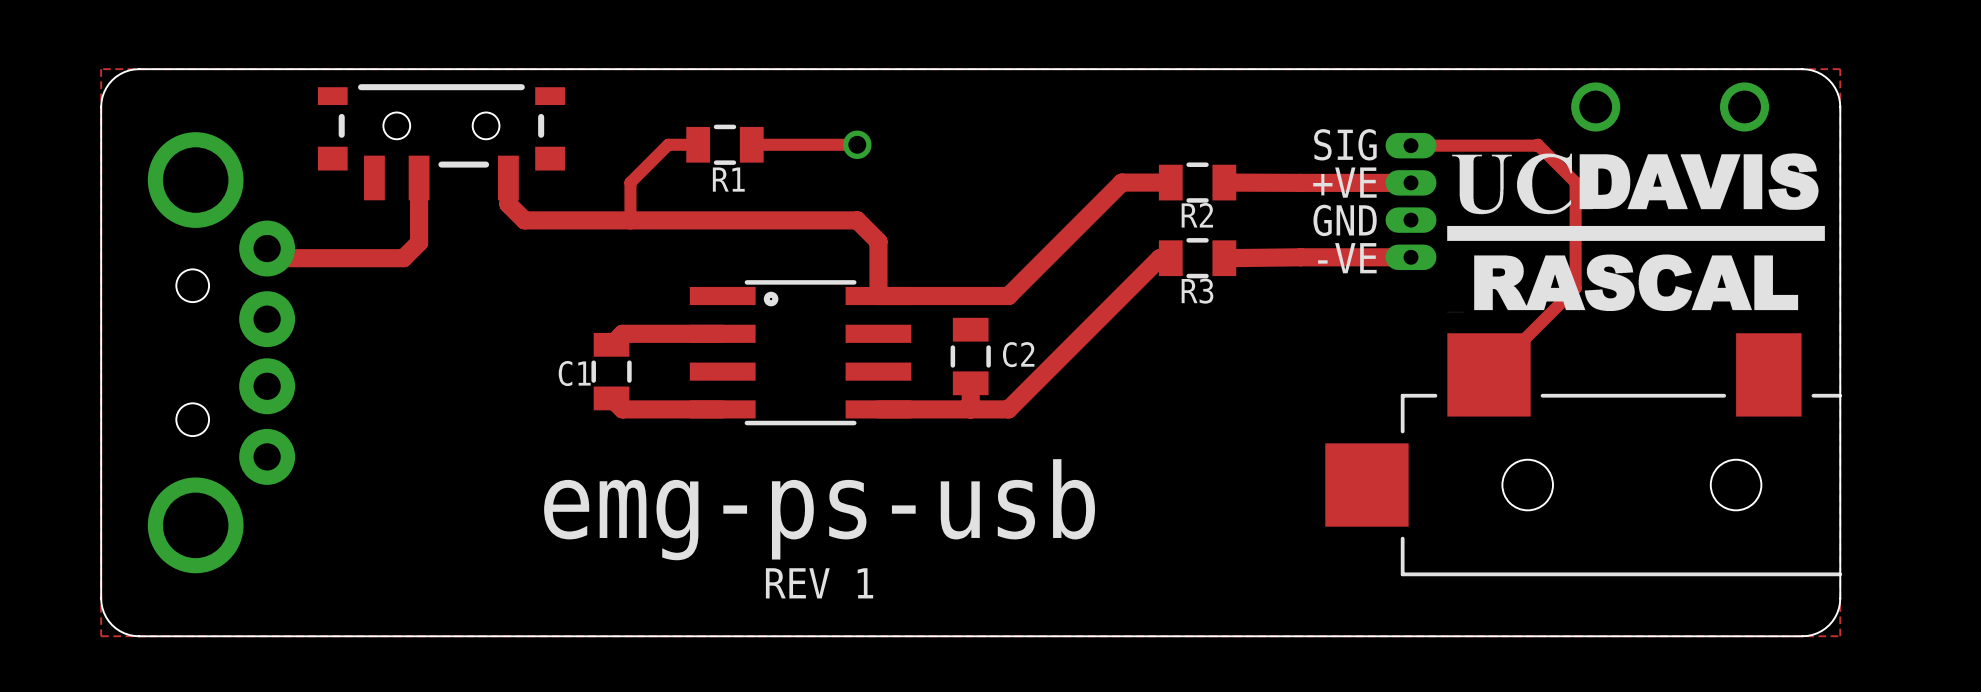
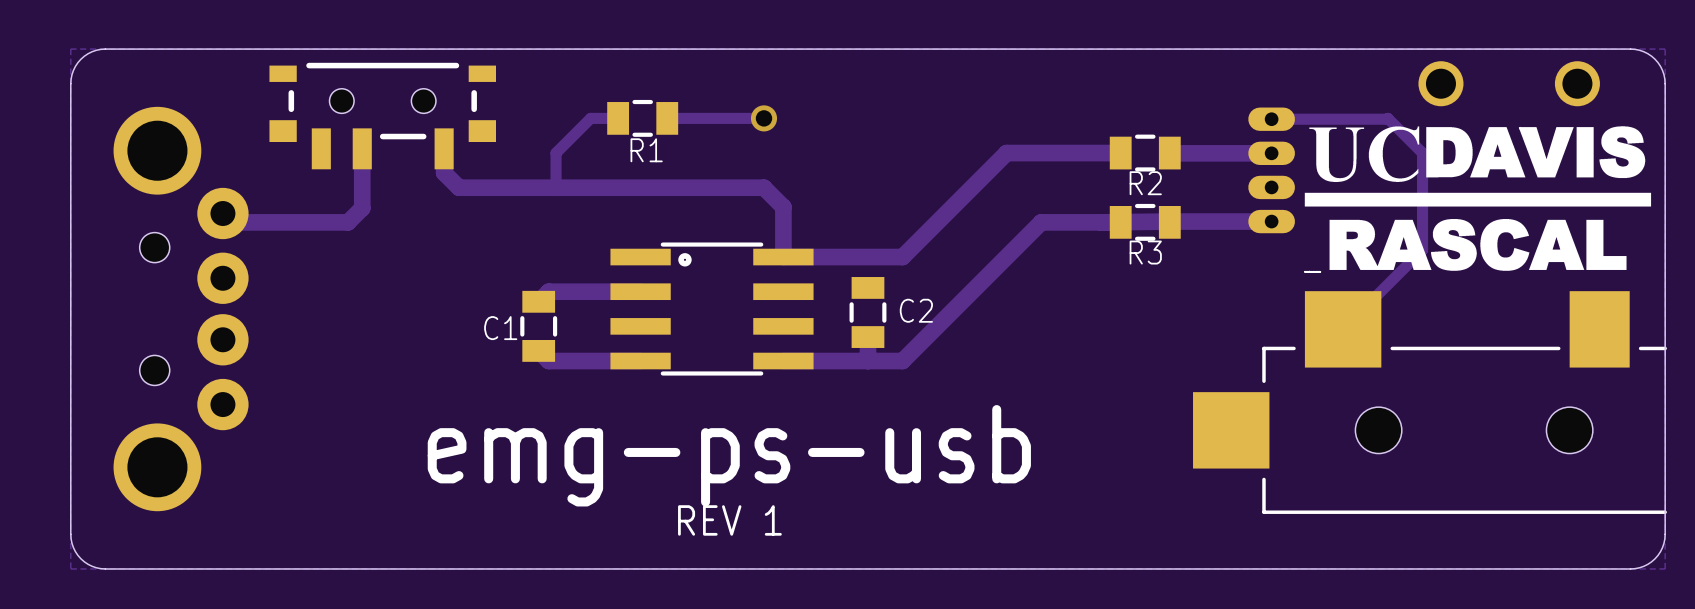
text: SIG (1345, 144) -> none
R2 position: (1197, 182) -> (1145, 153)
track: (1224, 182) (1300, 182) -> (1051, 153) (1120, 153)
text: +VE (1344, 182) -> none
text: GND (1345, 220) -> none
track: none -> (1051, 222) (1120, 222)
R3 position: (1197, 258) -> (1145, 222)
text: -VE (1347, 258) -> none

